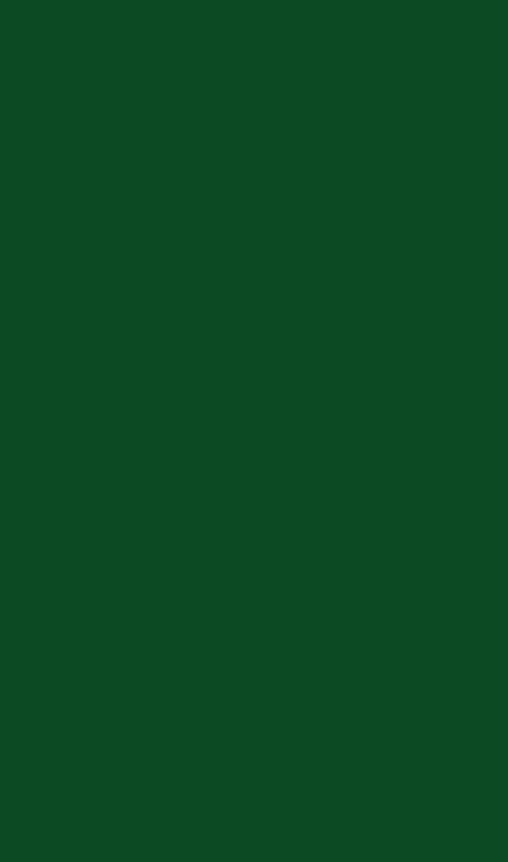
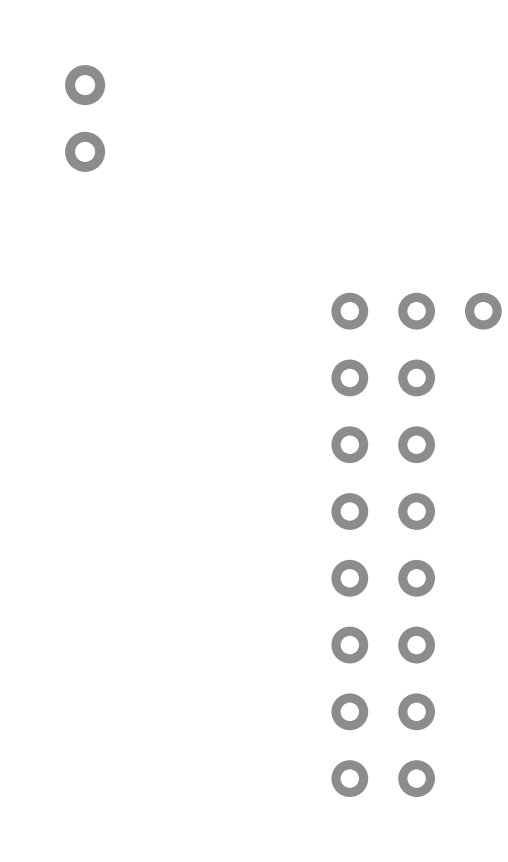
part: none -> (85, 118)
part: none -> (483, 311)
part: none -> (349, 544)
part: none -> (416, 544)

